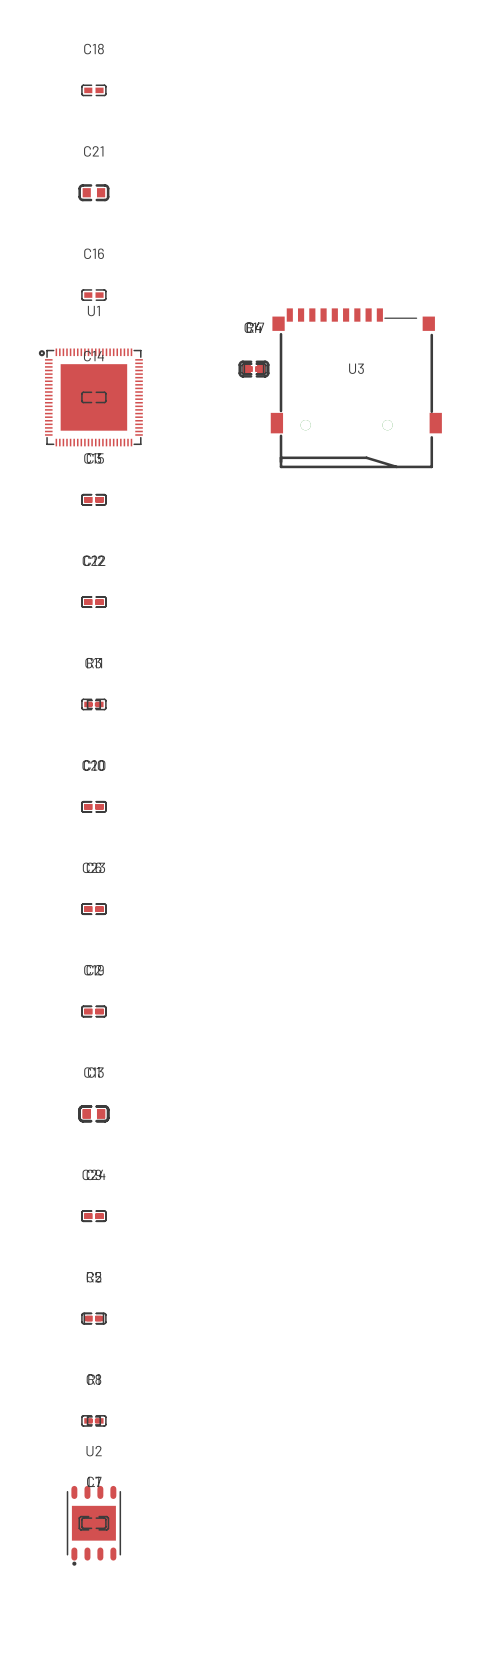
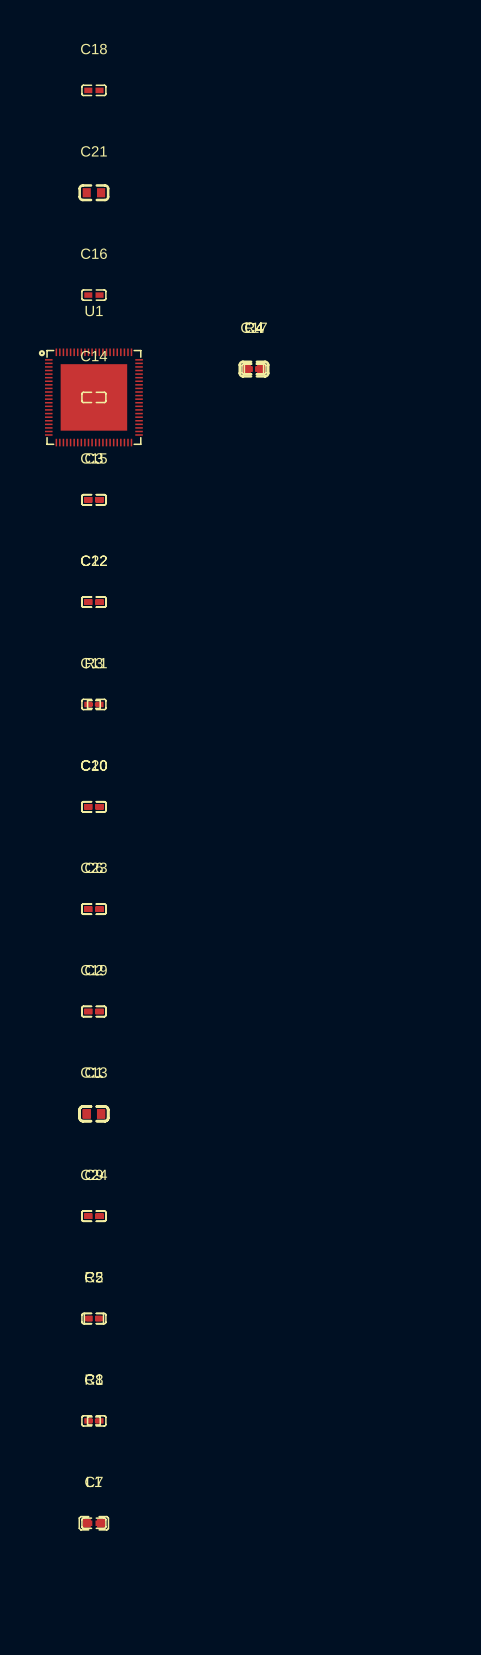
U3: (356, 388) -> none
U2: (93, 1525) -> none

